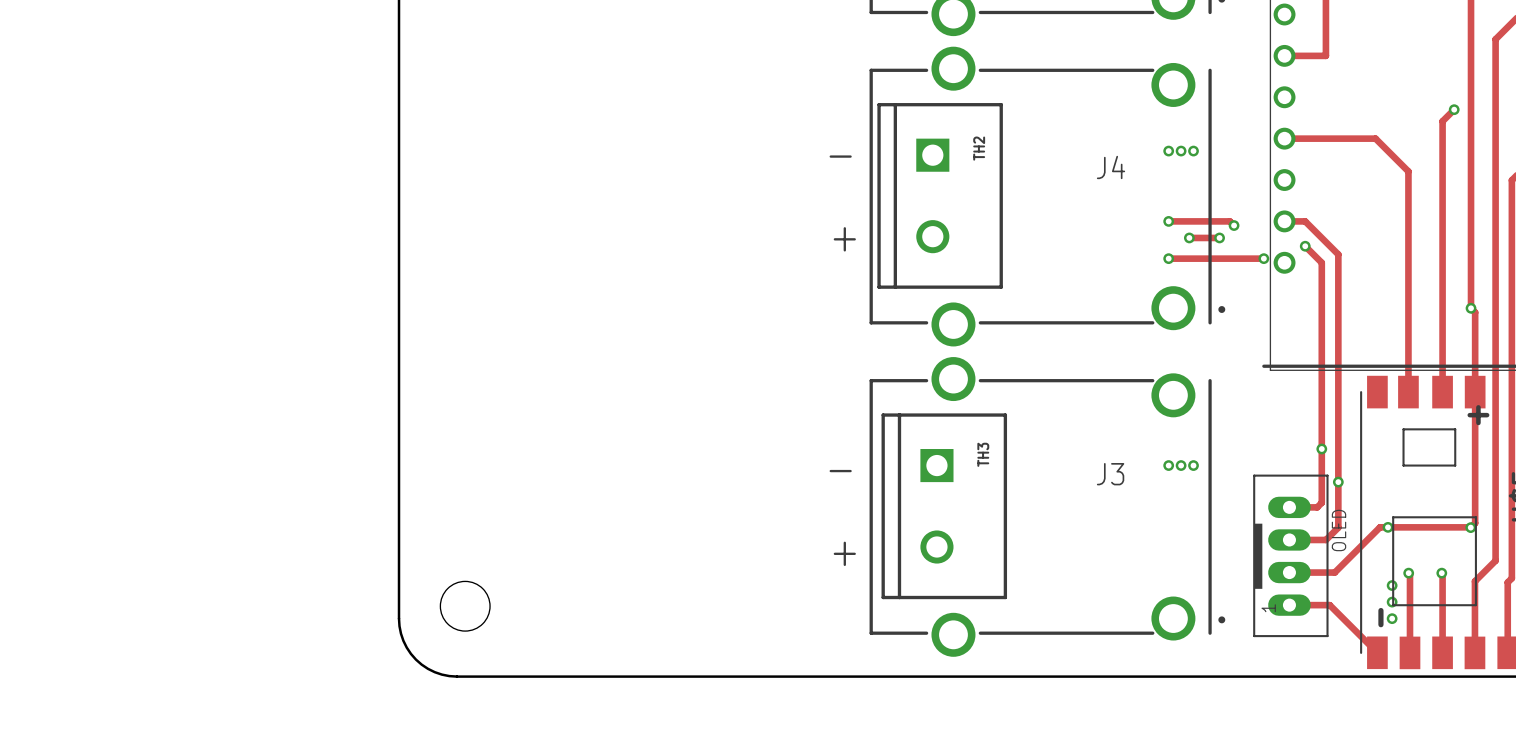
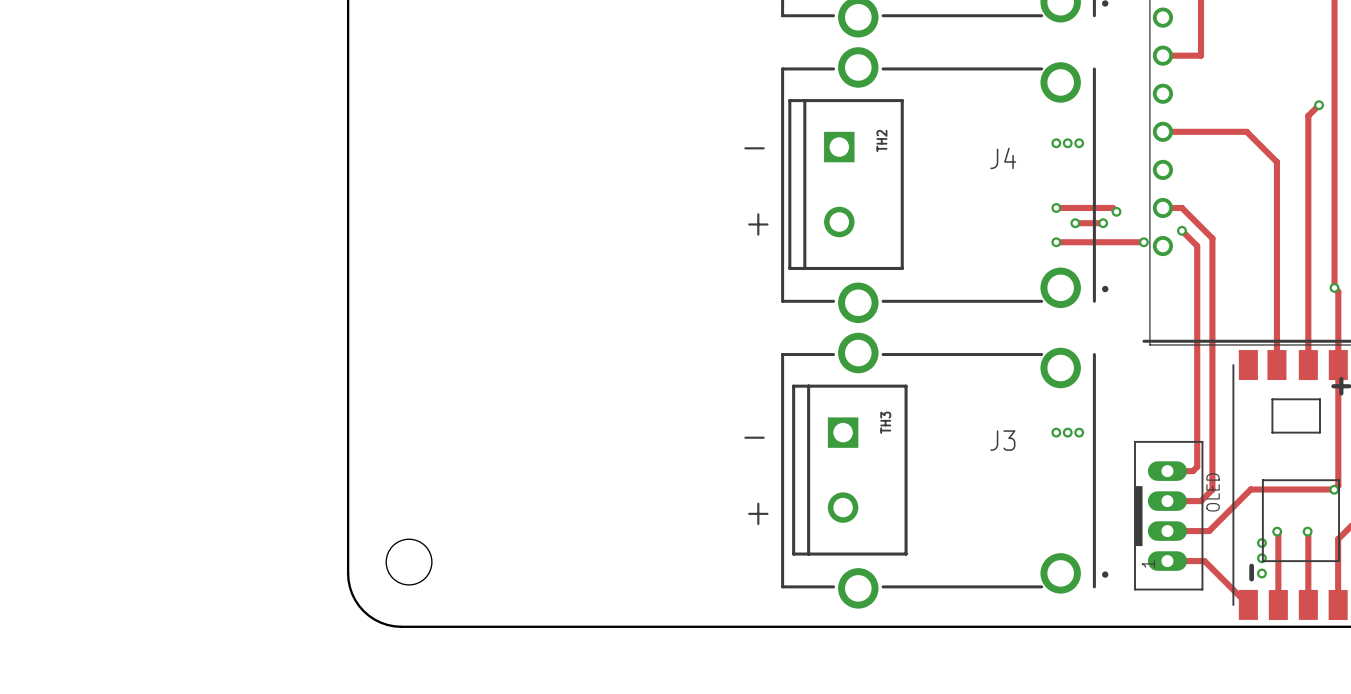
via: (1321, 448) -> none
via: (1338, 482) -> none
via: (1388, 527) -> none

